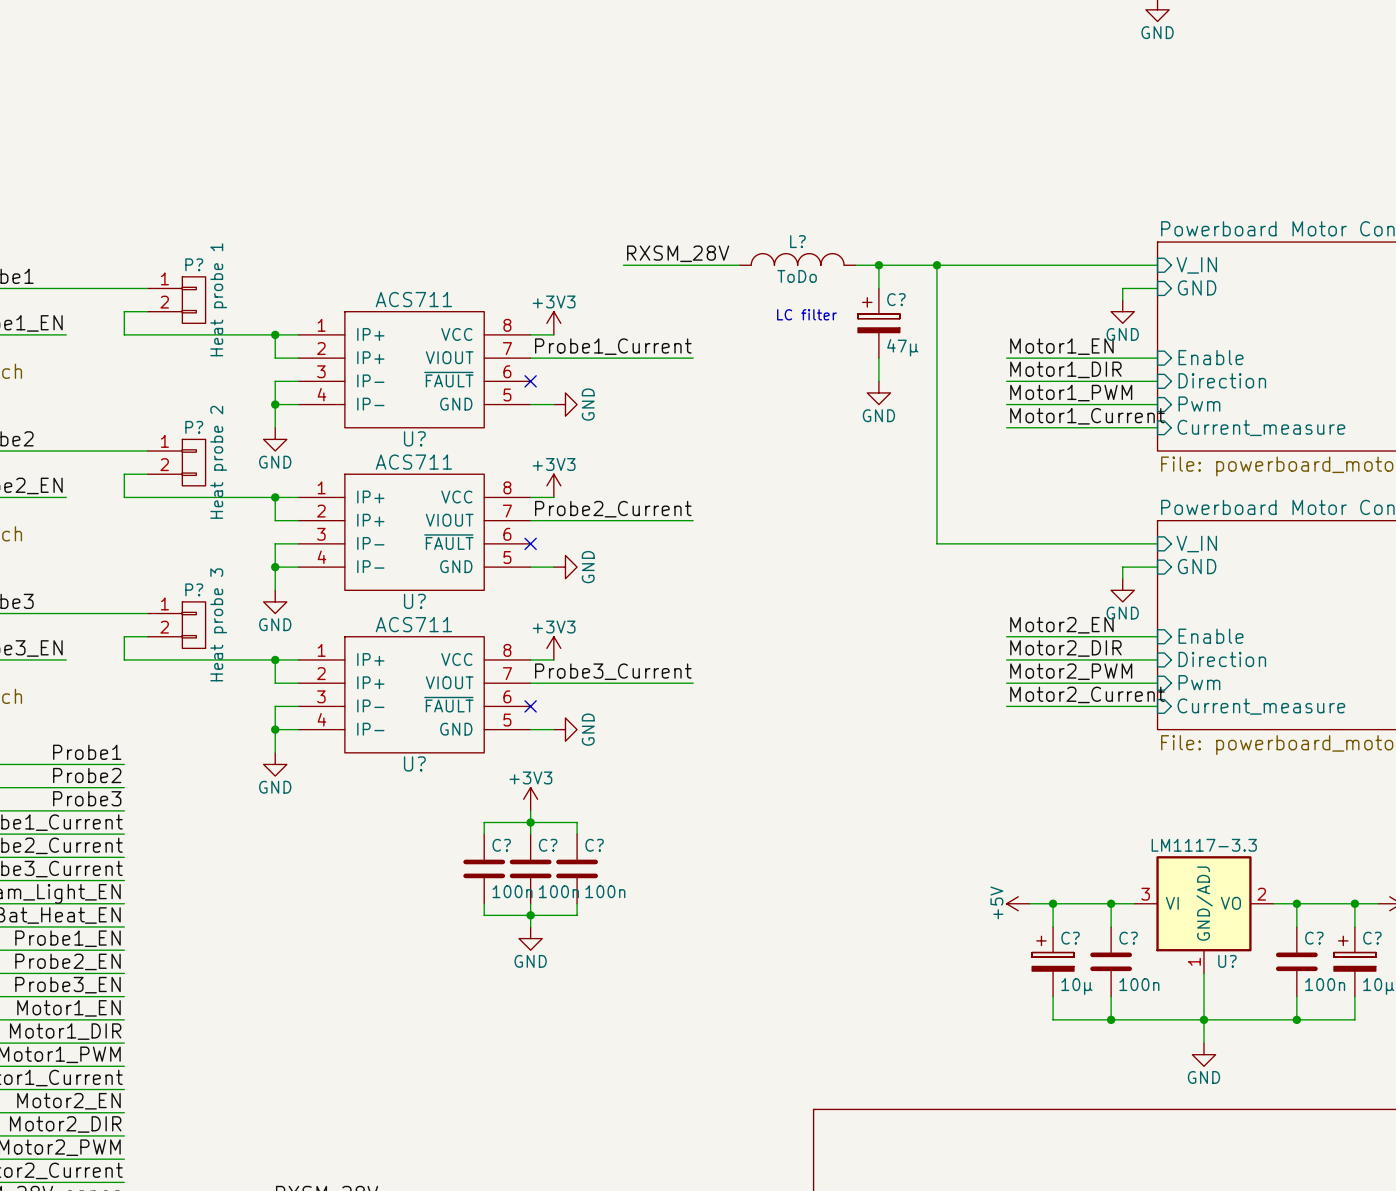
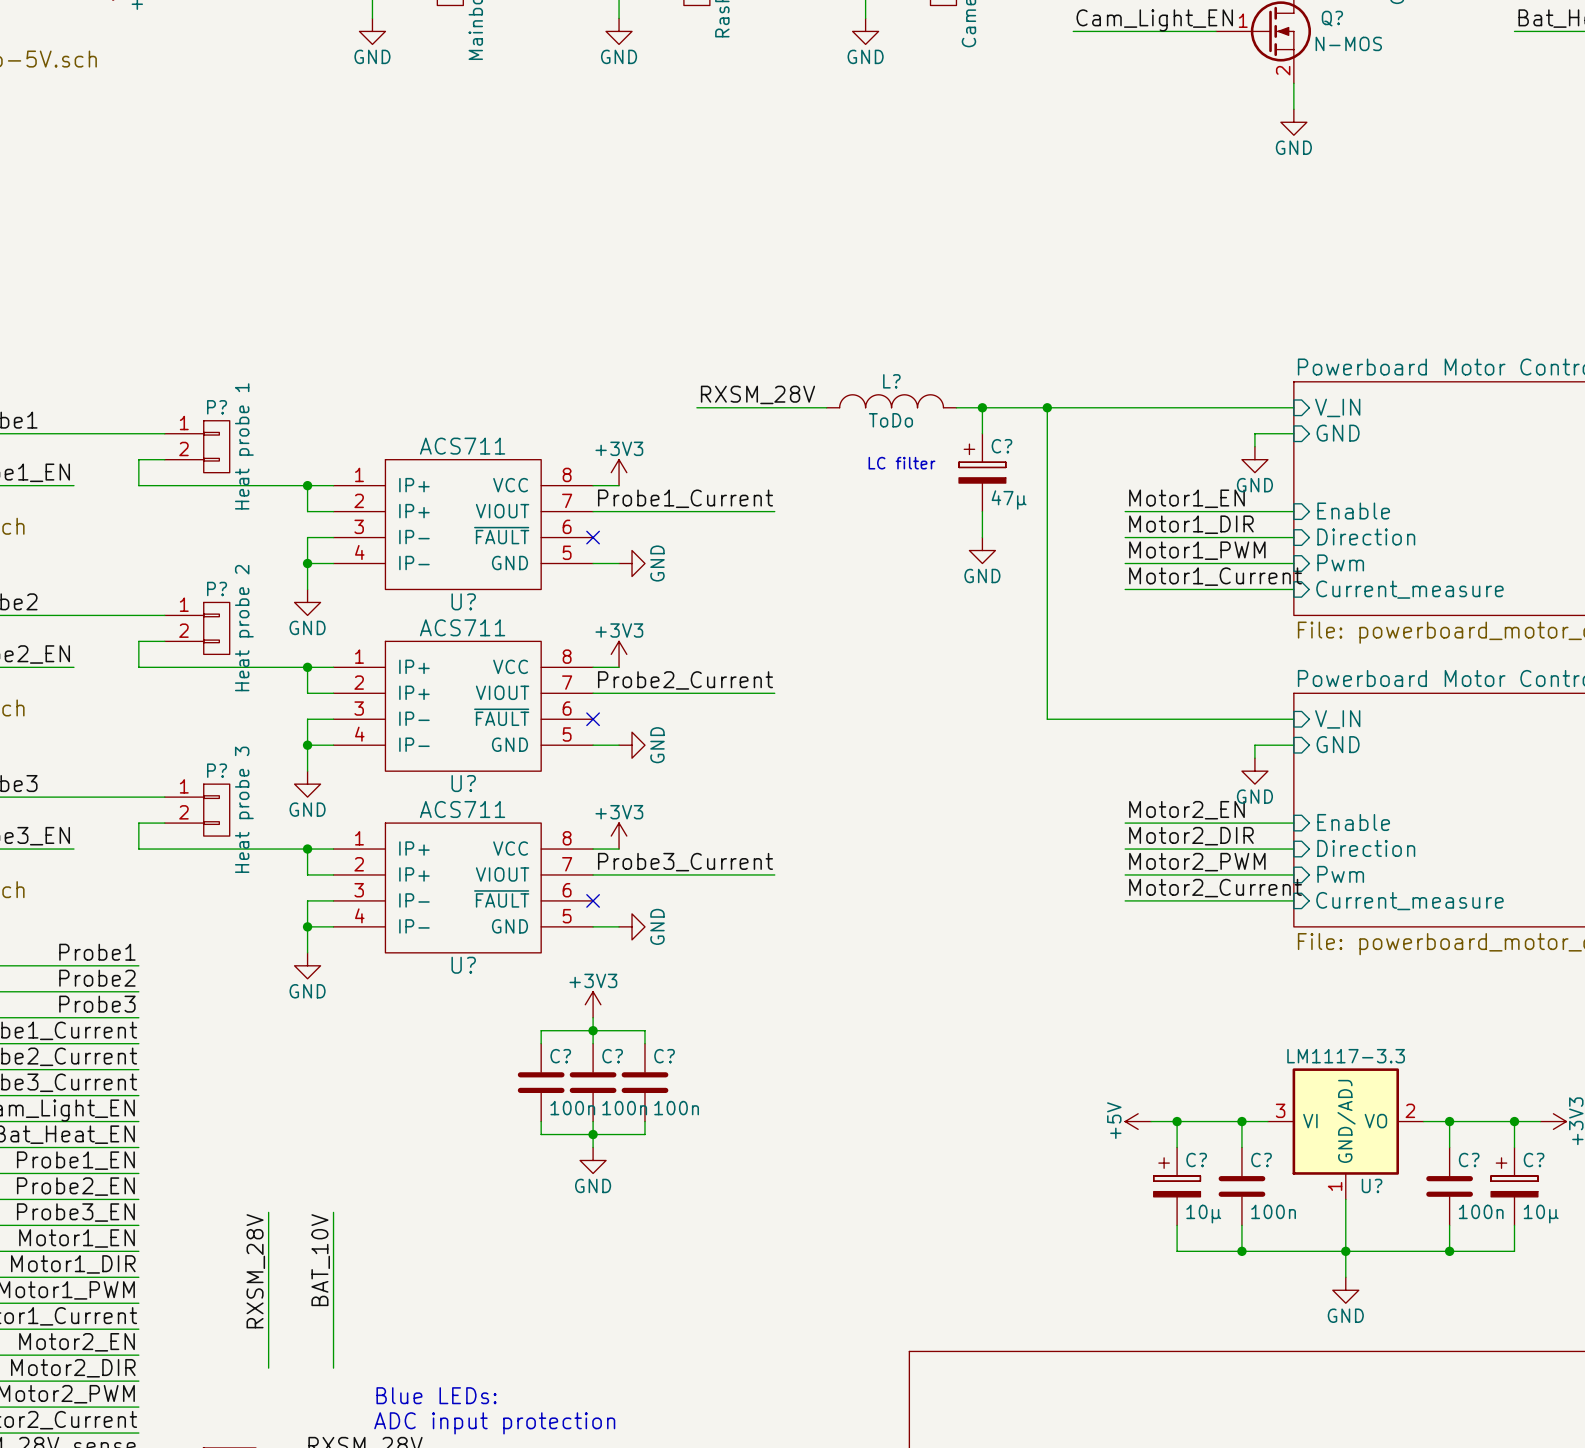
wire: none -> (268, 1212) (268, 1368)
wire: none -> (333, 1212) (333, 1368)
label: none -> BAT_10V (320, 1260)
label: none -> RXSM_28V (255, 1271)
text: none -> Blue LEDs: (436, 1395)
text: none -> ADC input protection (494, 1423)

